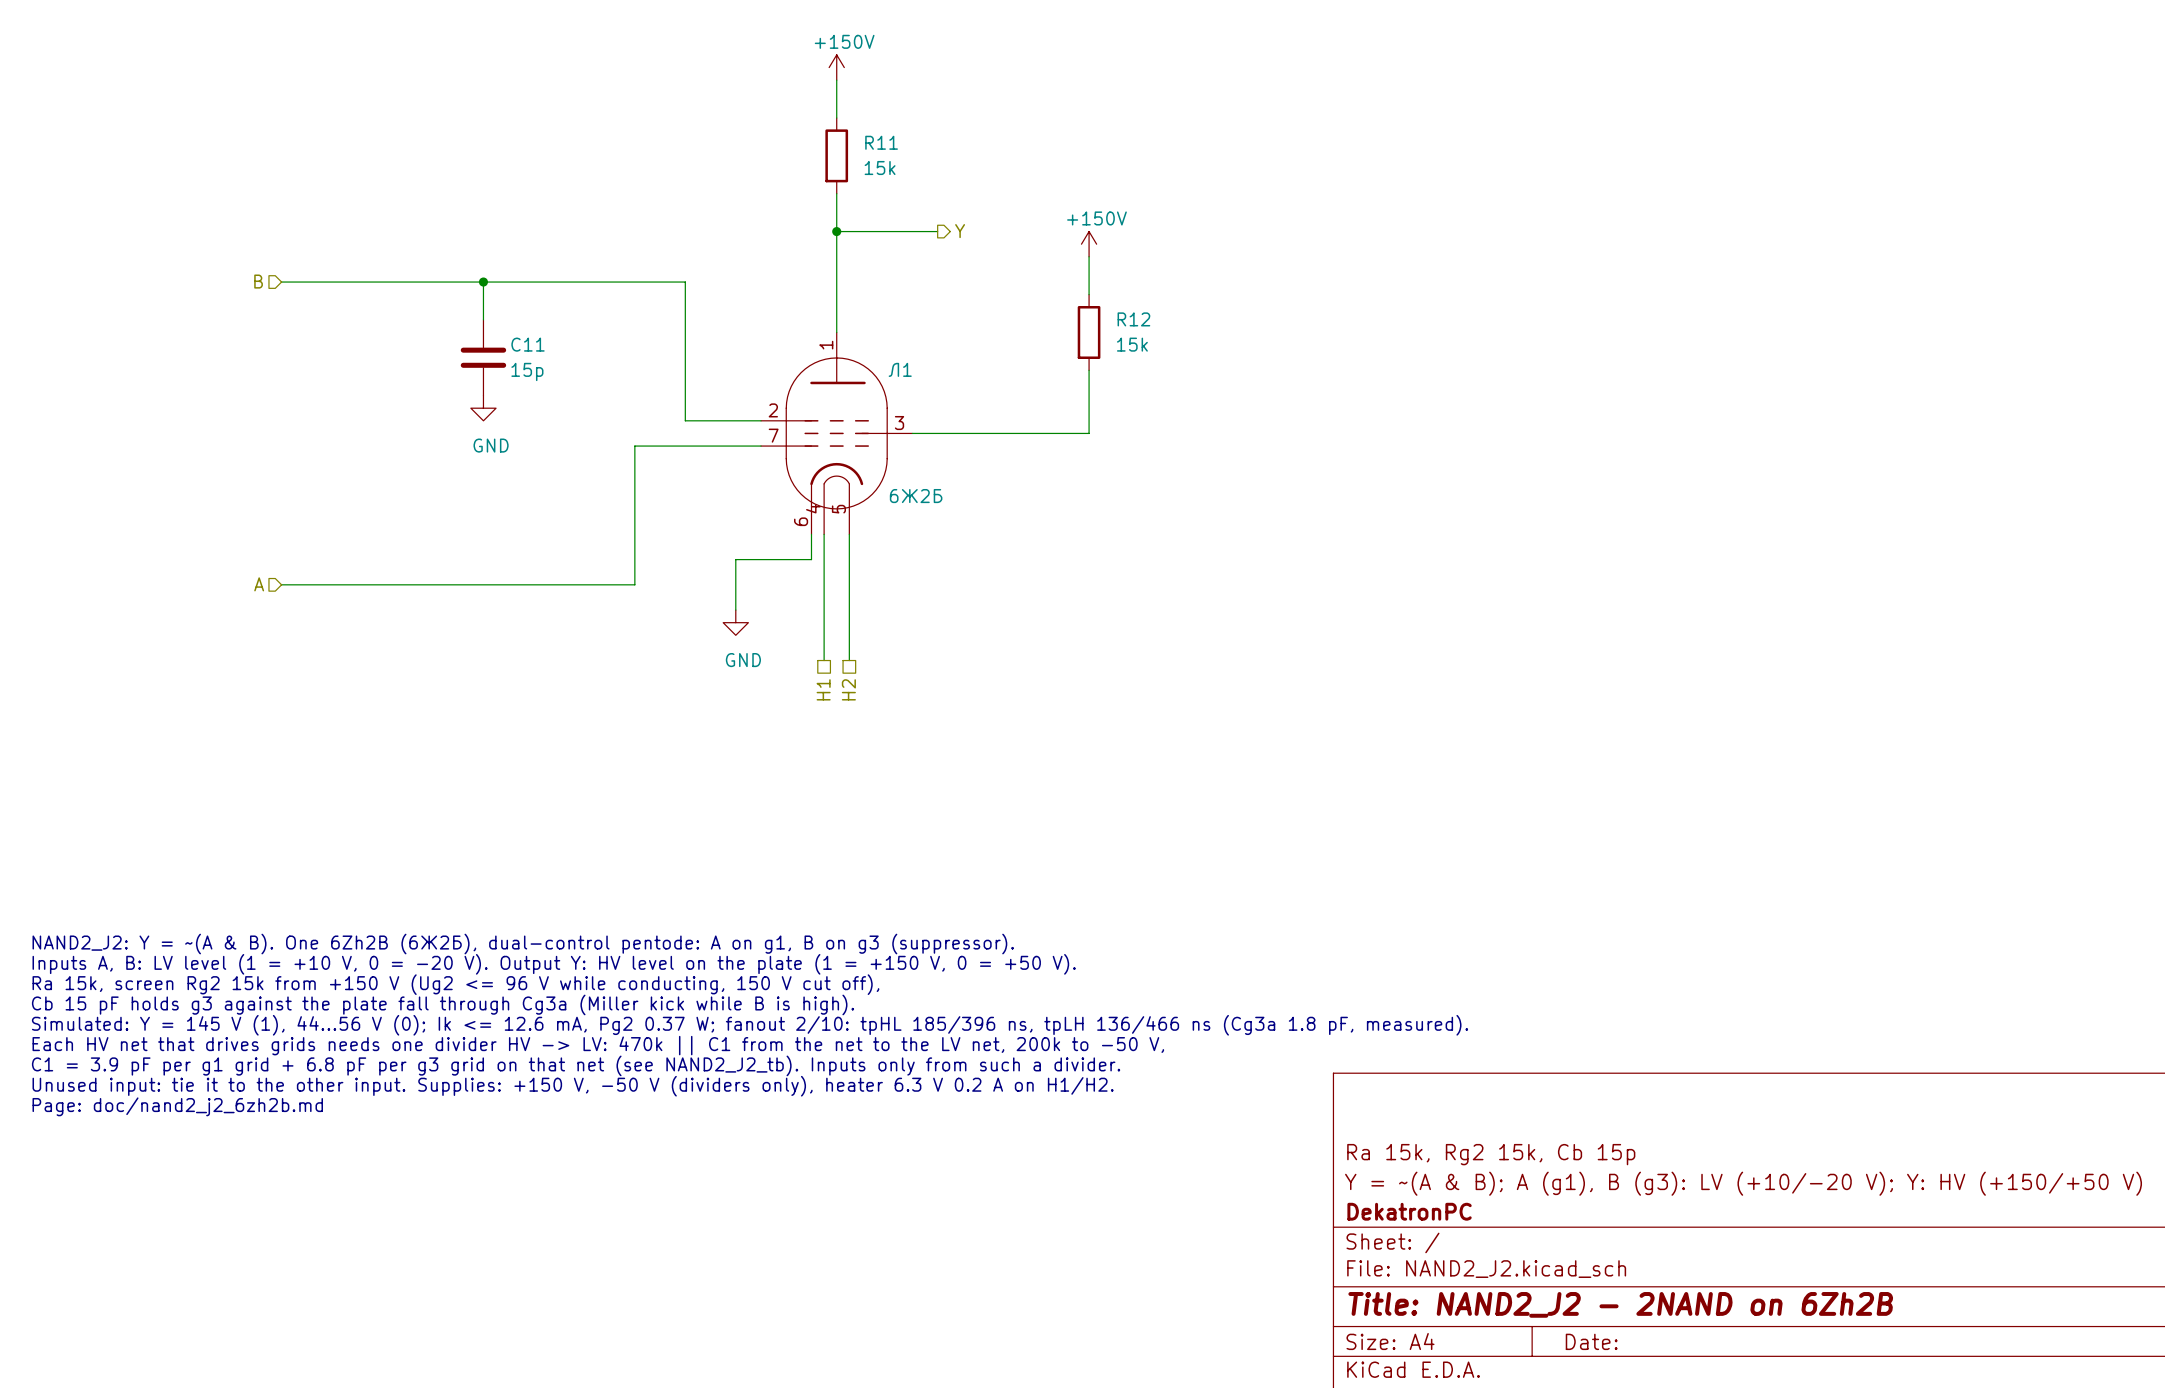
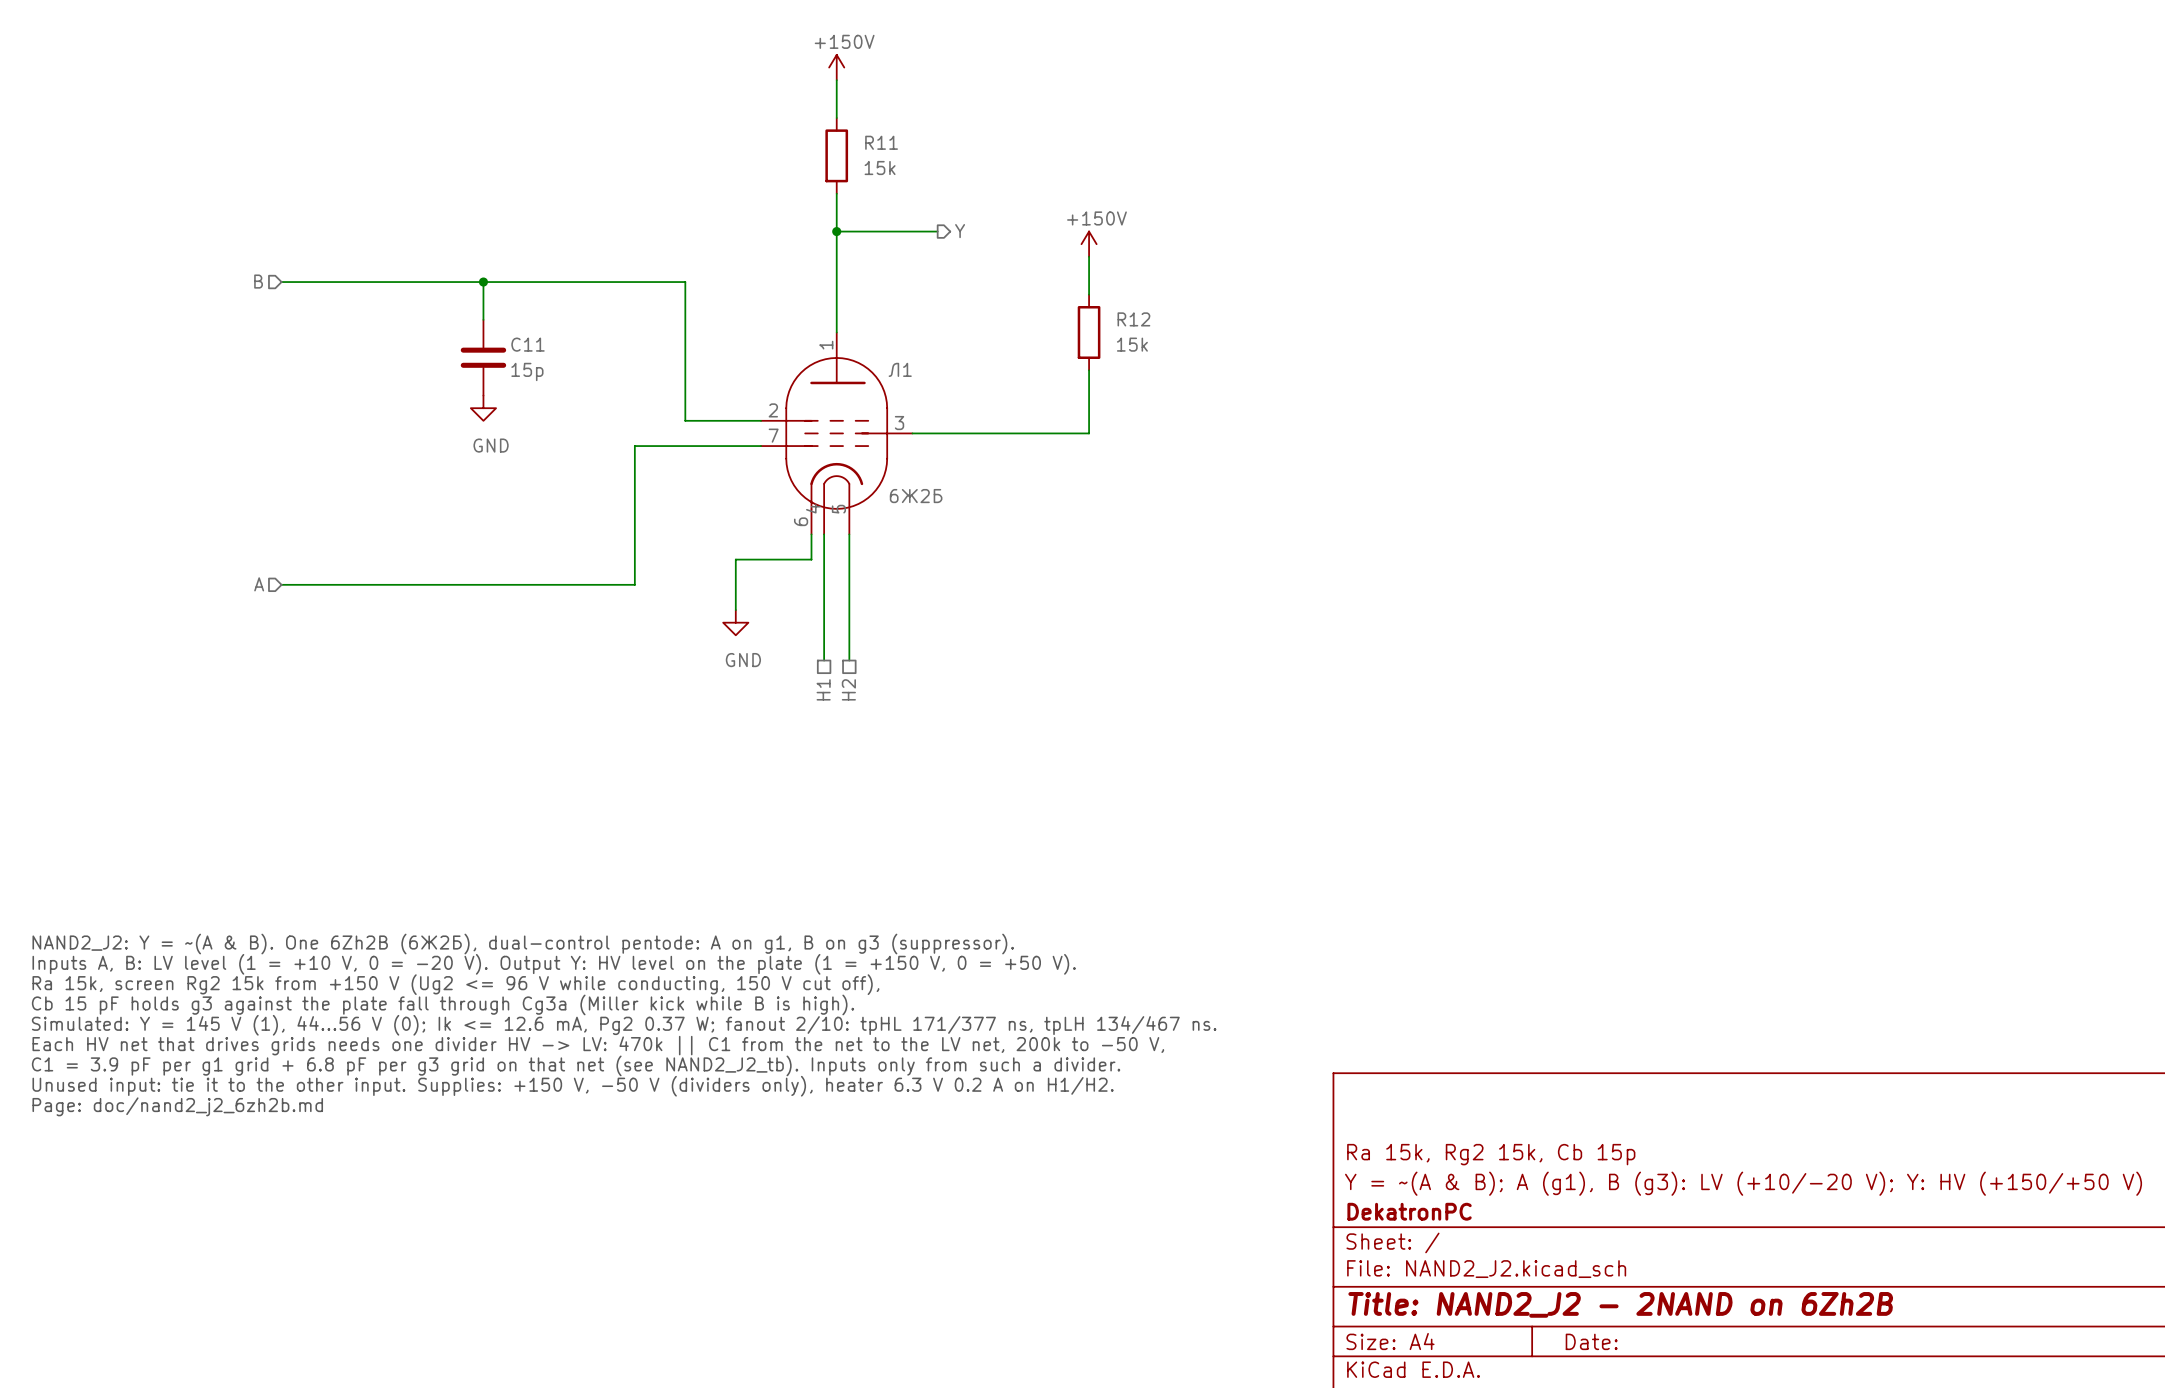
text: Simulated: Y = 145 V (1), 44...56 V (0); Ik <= 12.6 mA, Pg2 0.37 W; fanout 2/10: tpHL 185/396 ns, tpLH 136/466 ns (Cg3a 1.8 pF, measured). (750, 1025) -> Simulated: Y = 145 V (1), 44...56 V (0); Ik <= 12.6 mA, Pg2 0.37 W; fanout 2/10: tpHL 171/377 ns, tpLH 134/467 ns. (624, 1025)

